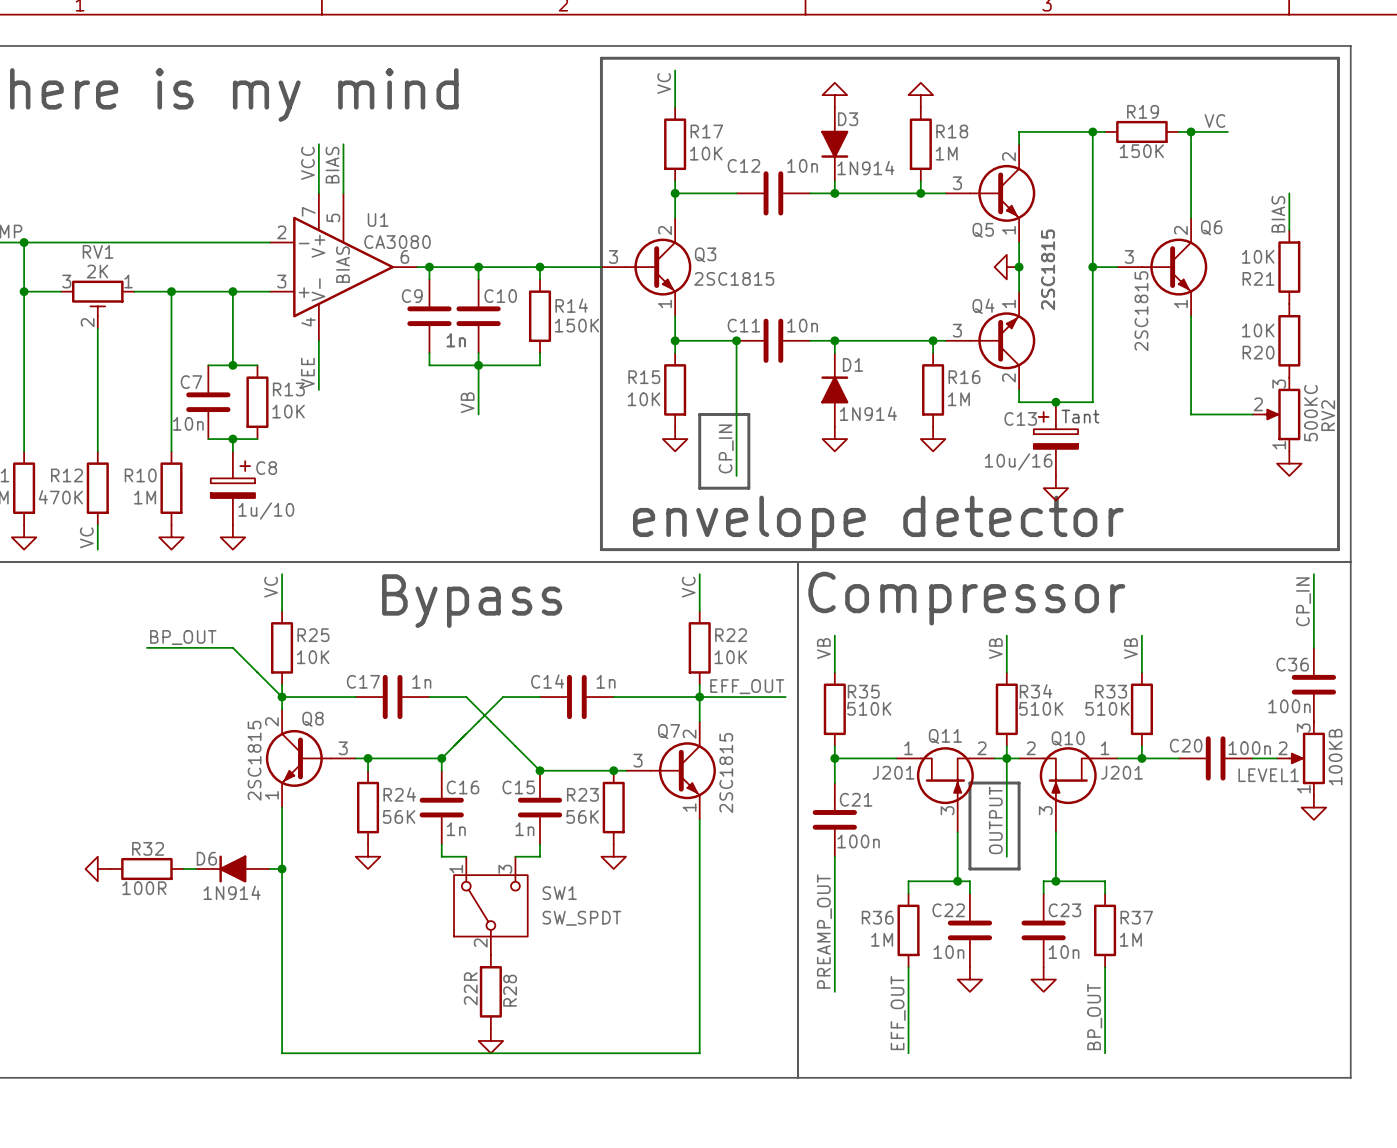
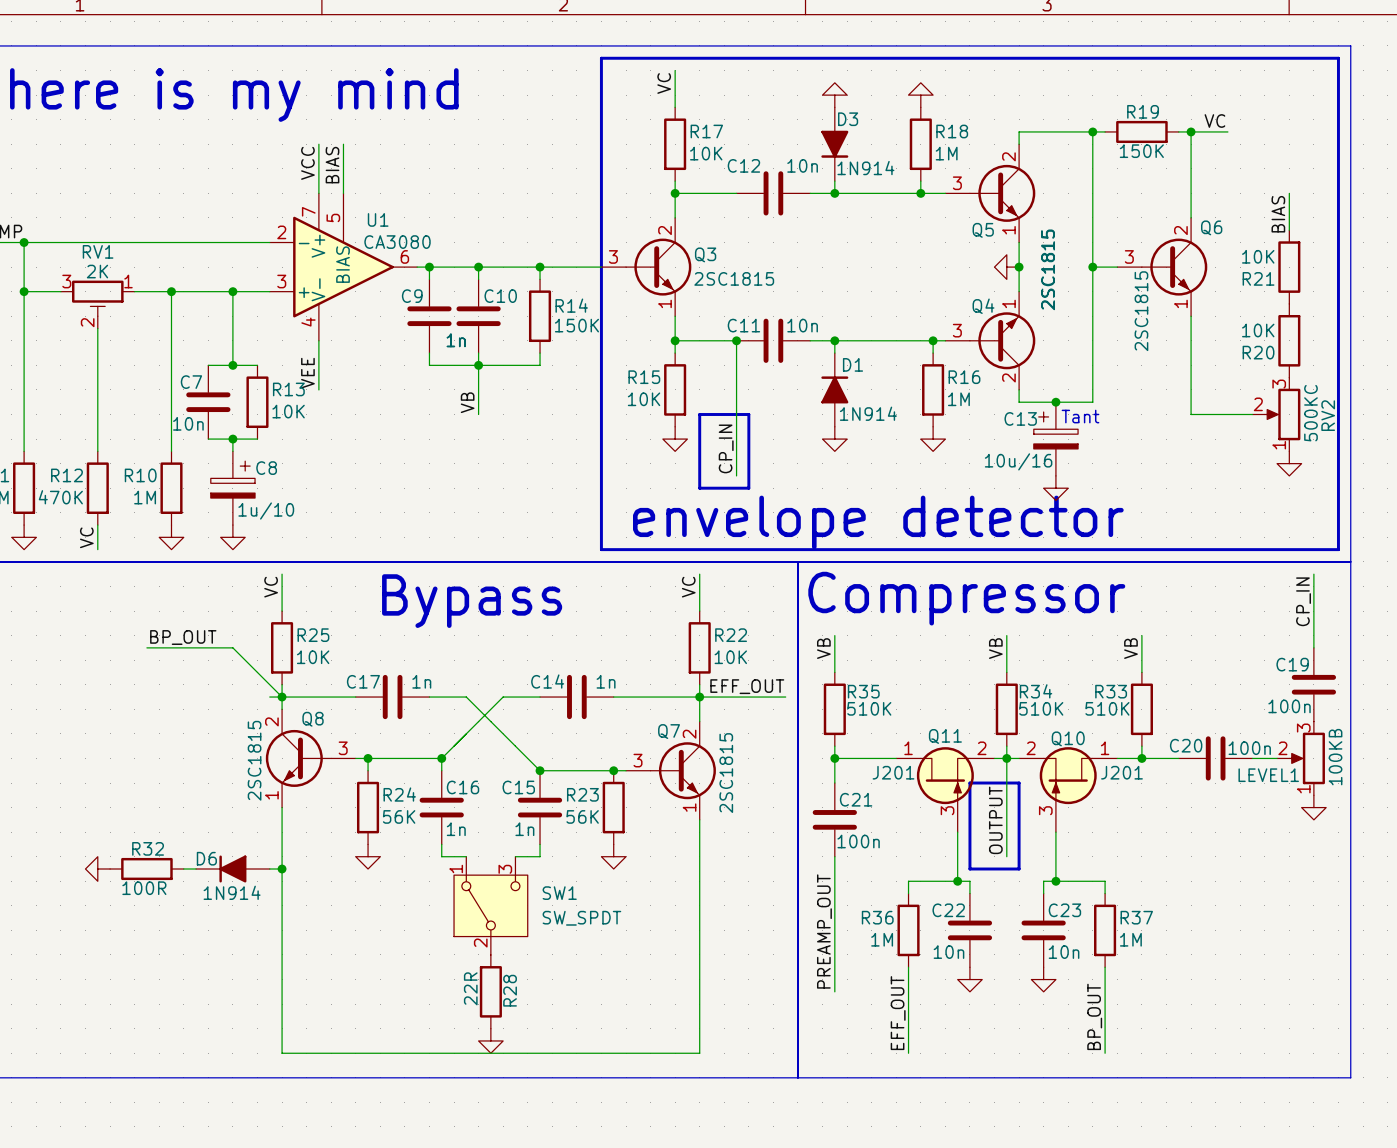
C36 name: C36 (1292, 664) -> C19 (1292, 664)
wire: none -> (269, 697) (282, 697)

